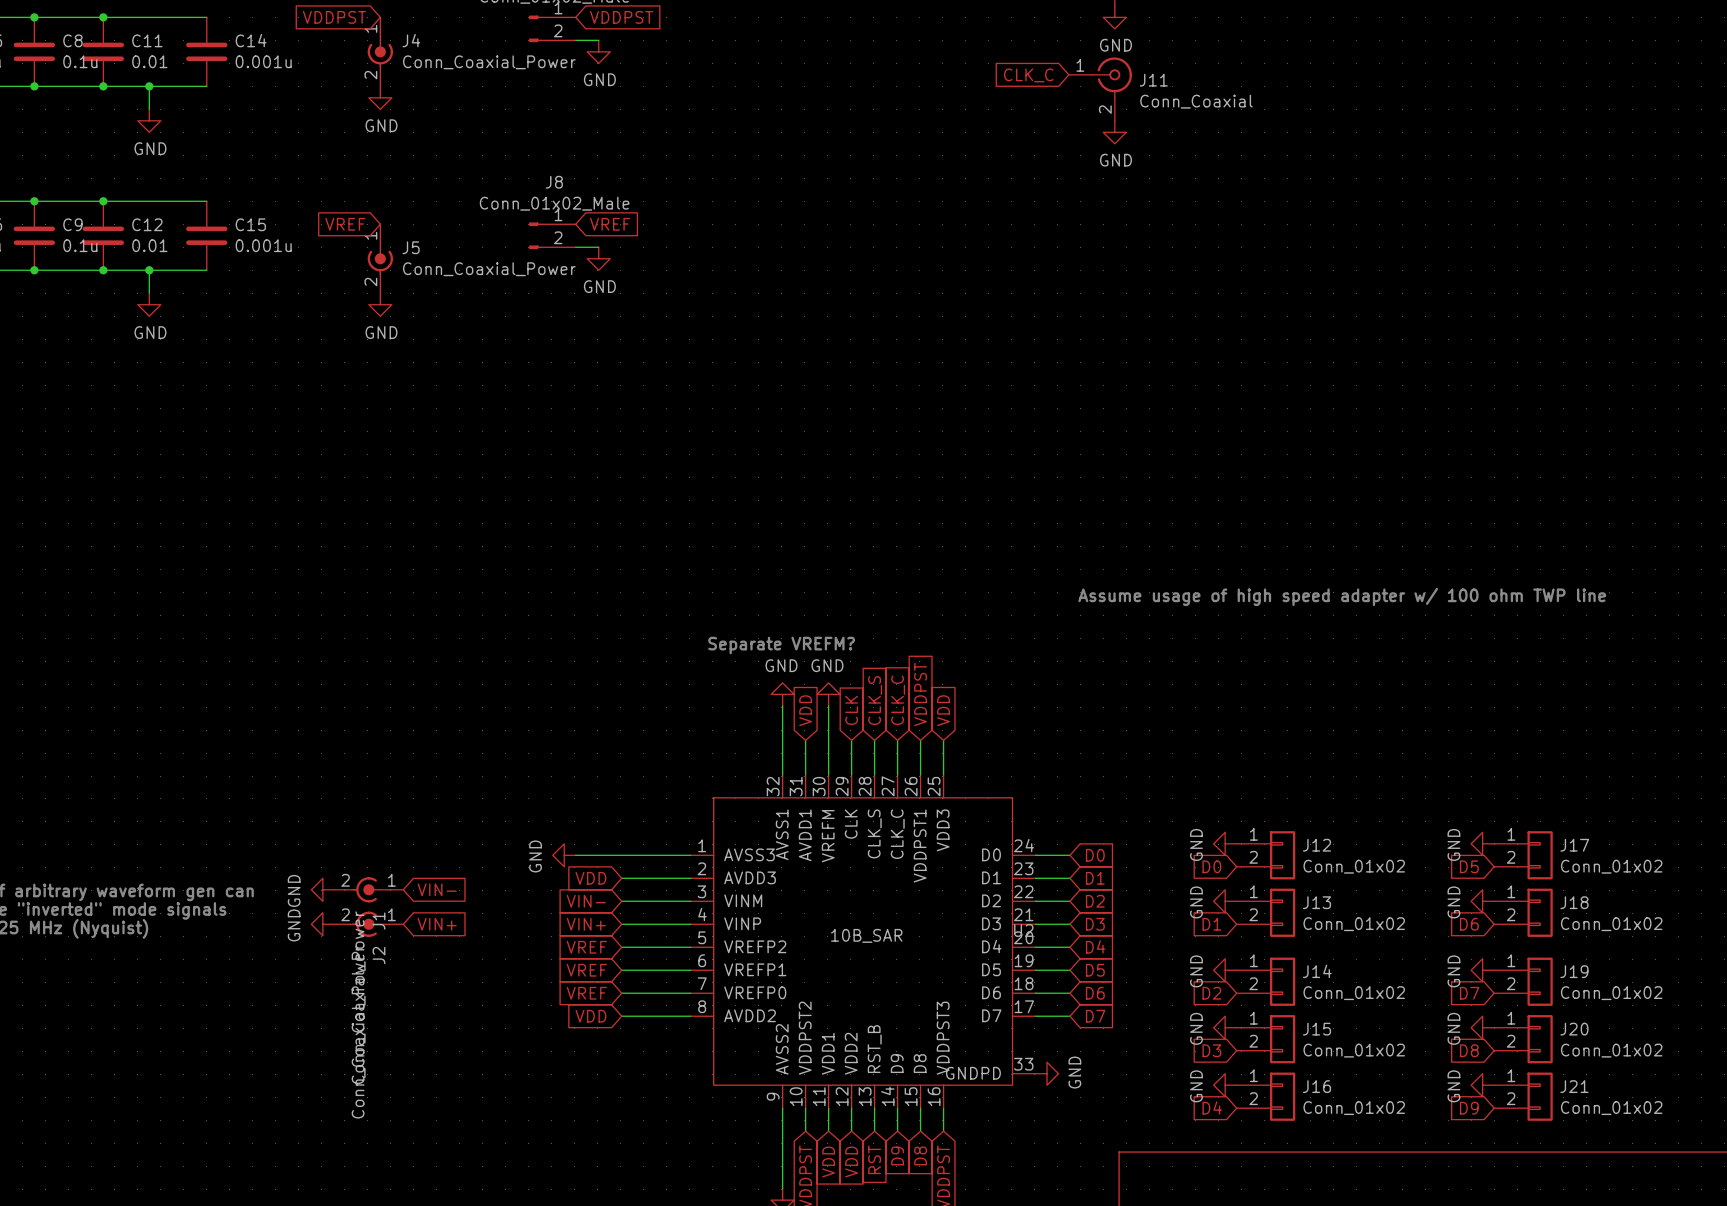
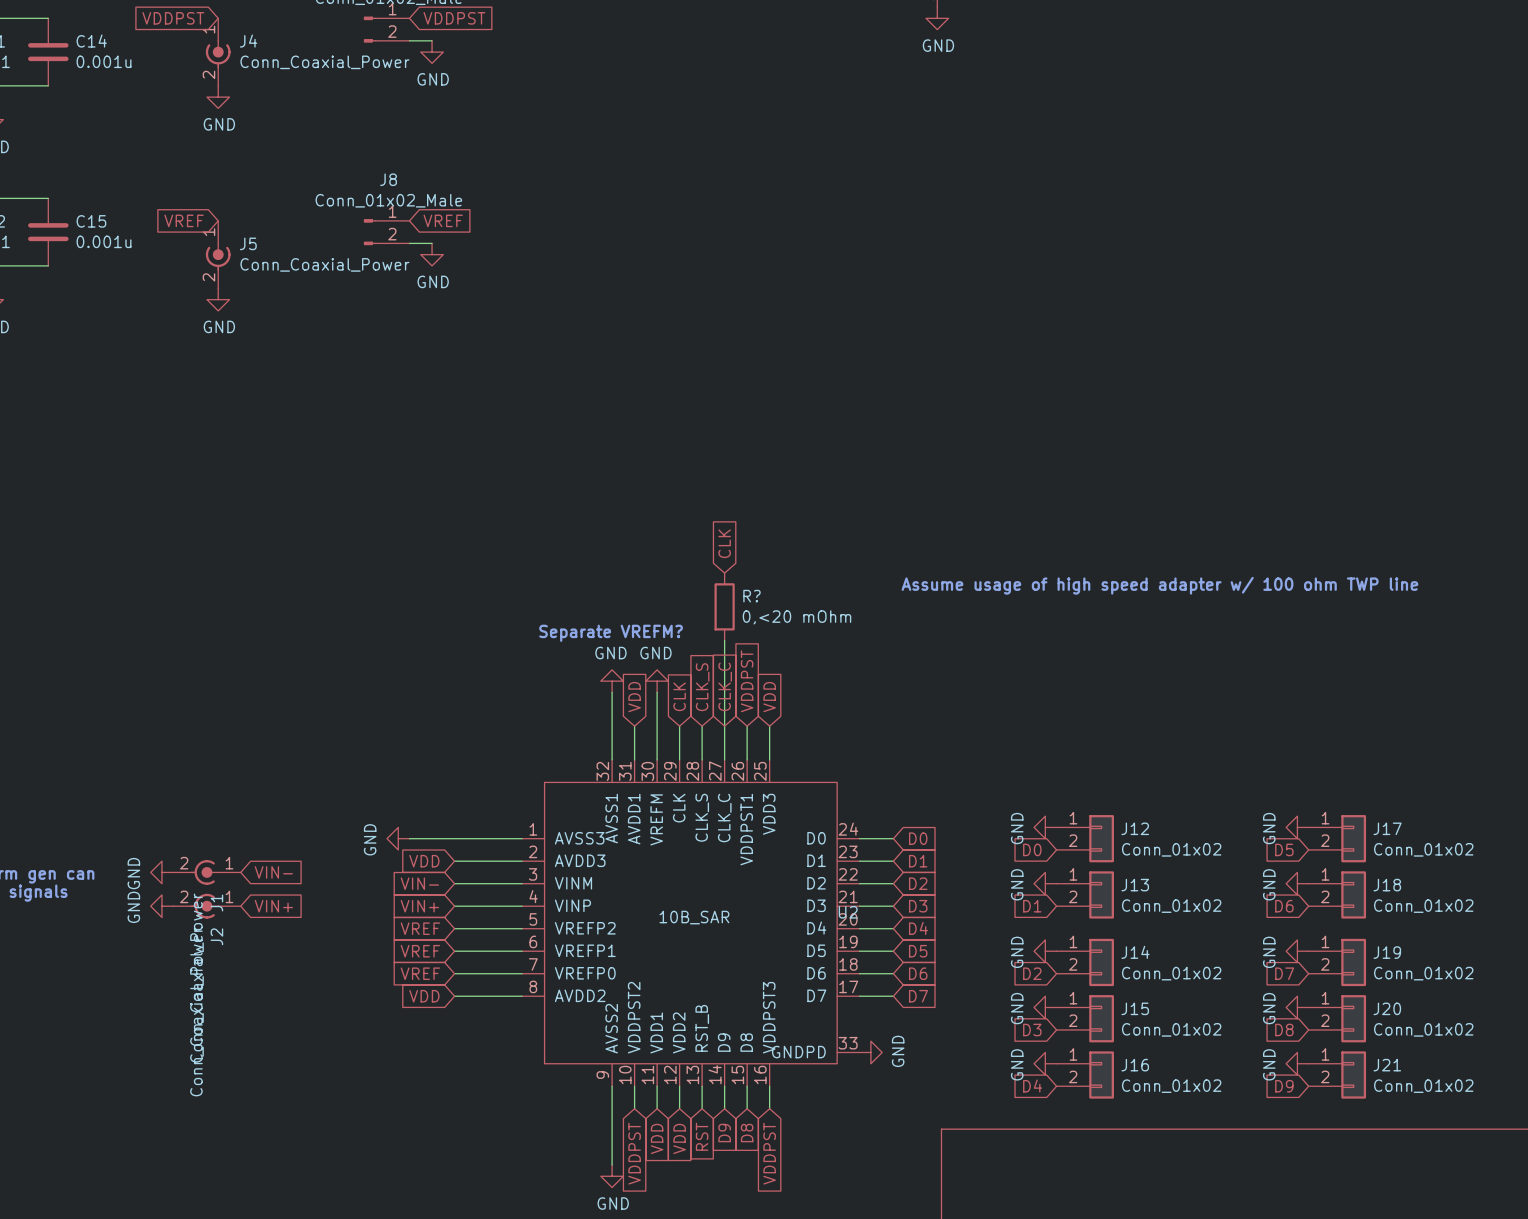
global label: CLK_C (1028, 75) -> none
J11: Conn_Coaxial (1100, 89) -> none
power symbol: GND (1114, 132) -> none
global label: none -> CLK (724, 543)
R?: none -> 0,<20 mOhm (724, 606)
wire: none -> (724, 640) (724, 726)

